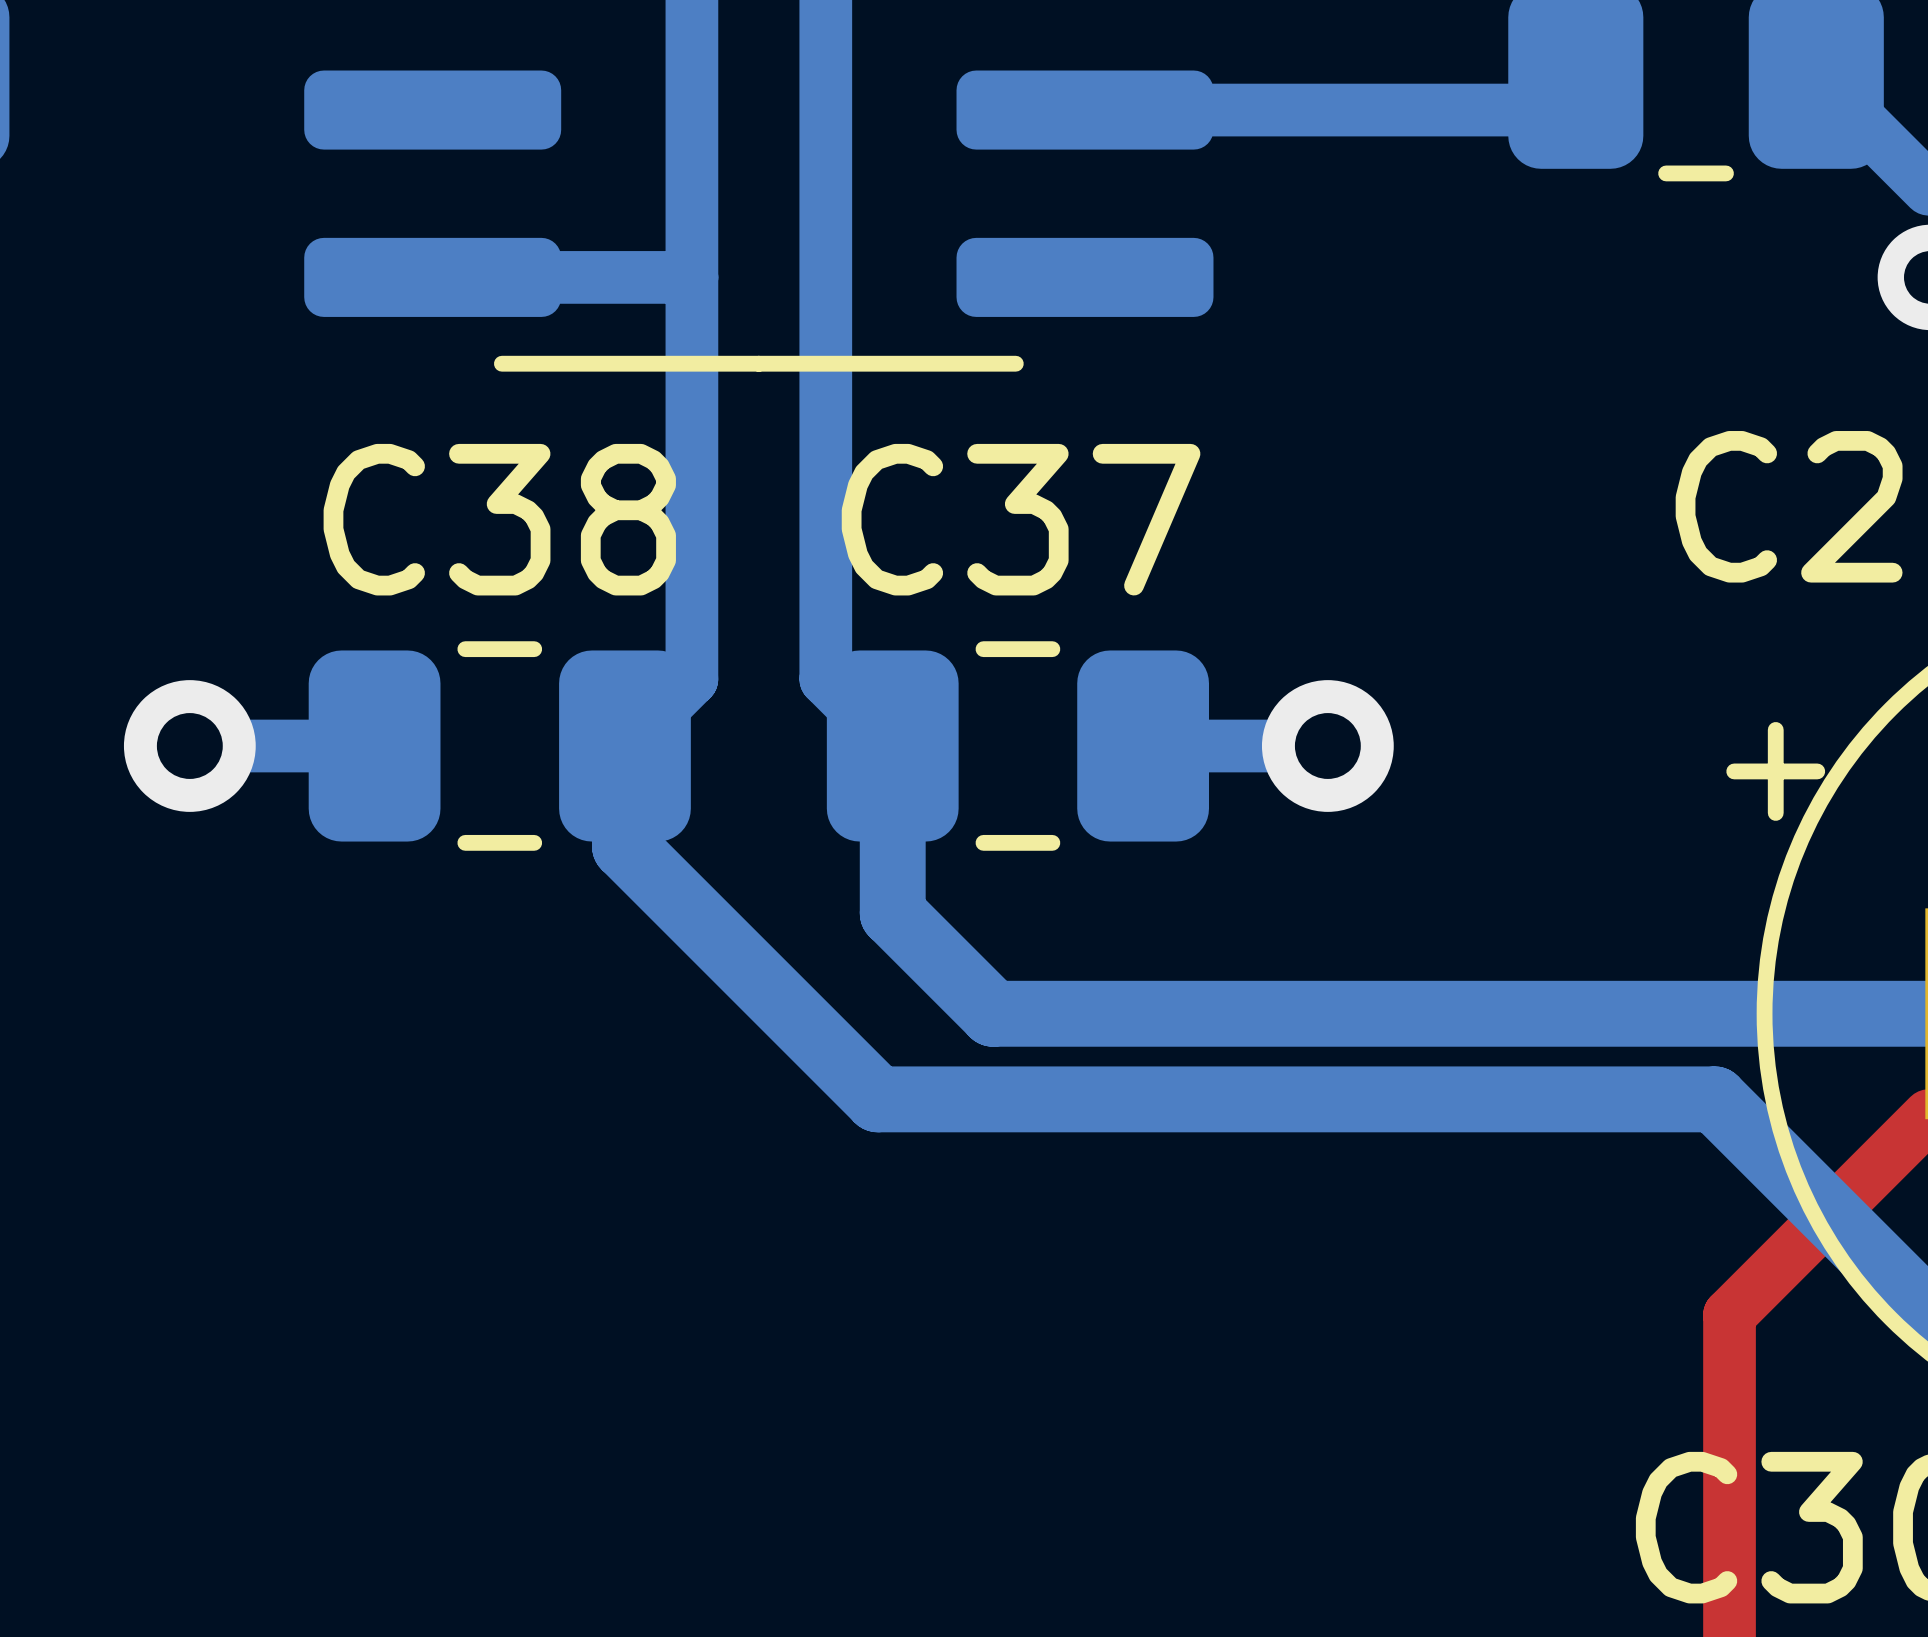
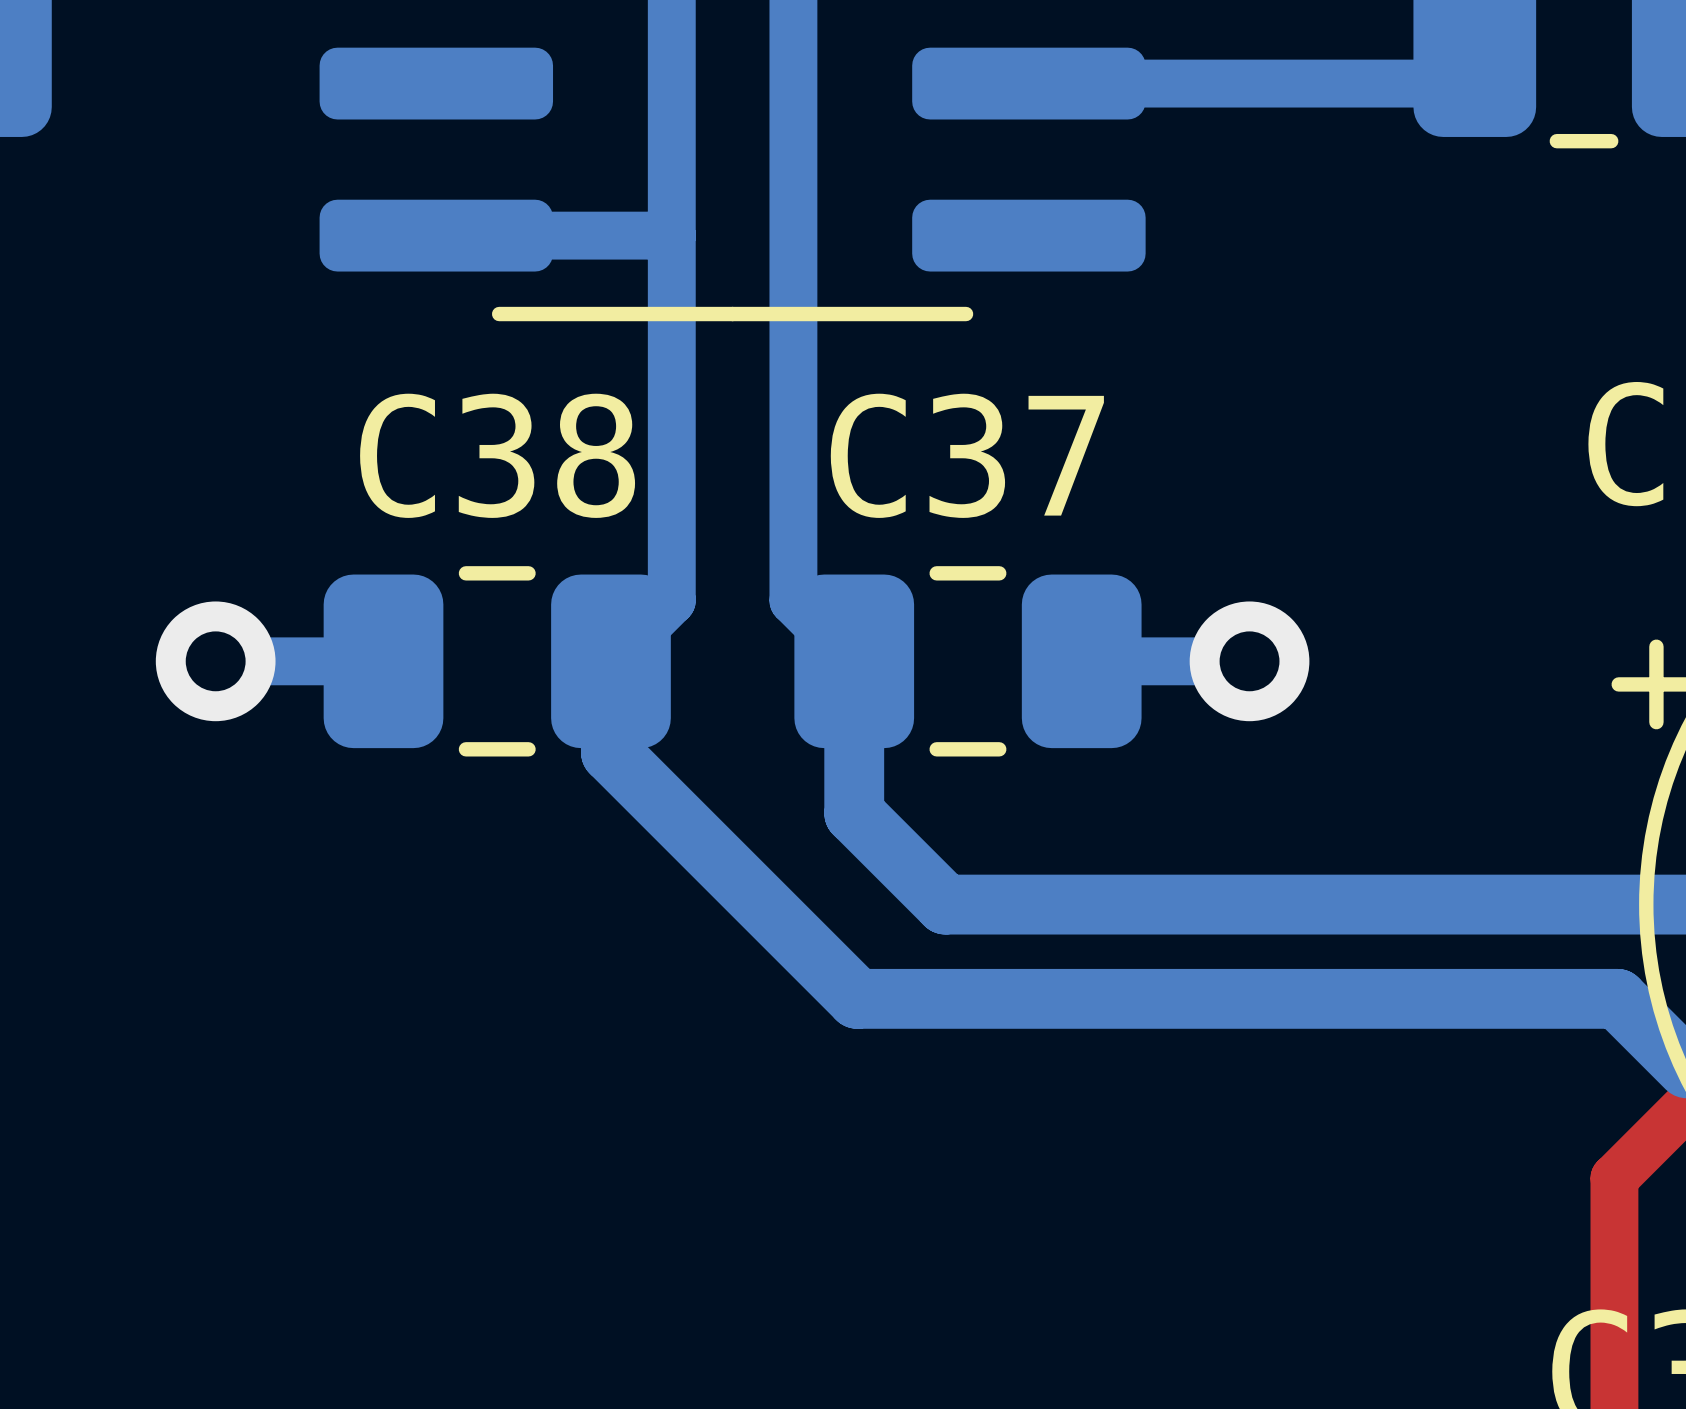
bottom track: (877, 1099) (1714, 1099) (1732, 1117) -> (840, 982) (857, 998) (1617, 998)

